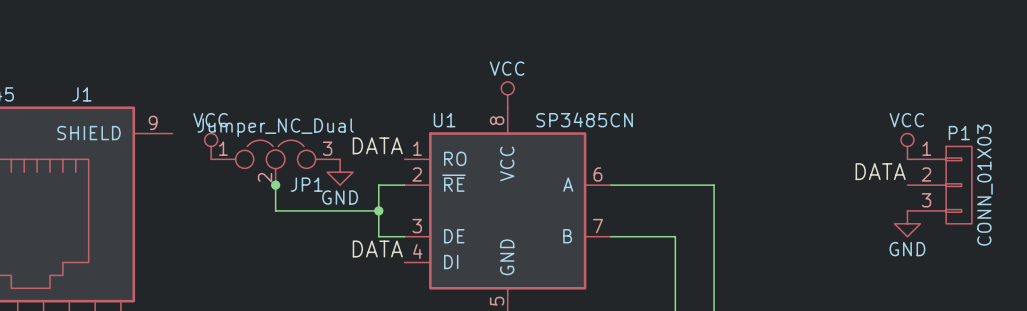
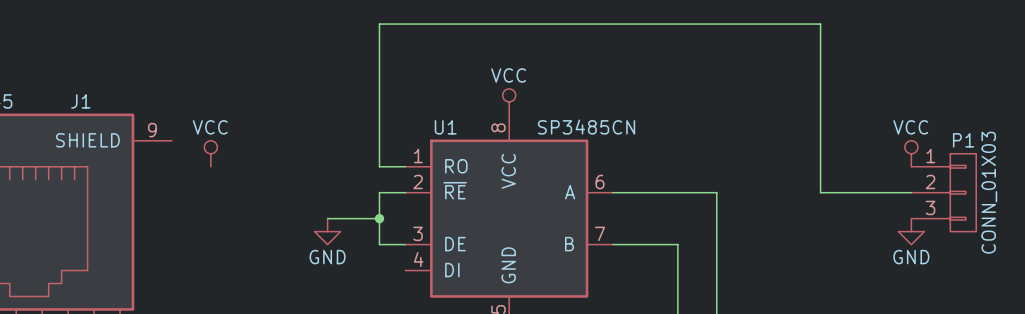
label: DATA (377, 145) -> none
wire: none -> (405, 166) (379, 166) (379, 24) (820, 24) (820, 192) (911, 192)
JP1: Jumper_NC_Dual (275, 162) -> none
label: DATA (880, 171) -> none
power symbol position: GND (340, 172) -> GND (327, 231)
wire: (275, 185) (275, 210) (327, 210) -> none
junction: (275, 185) -> none
label: DATA (377, 249) -> none

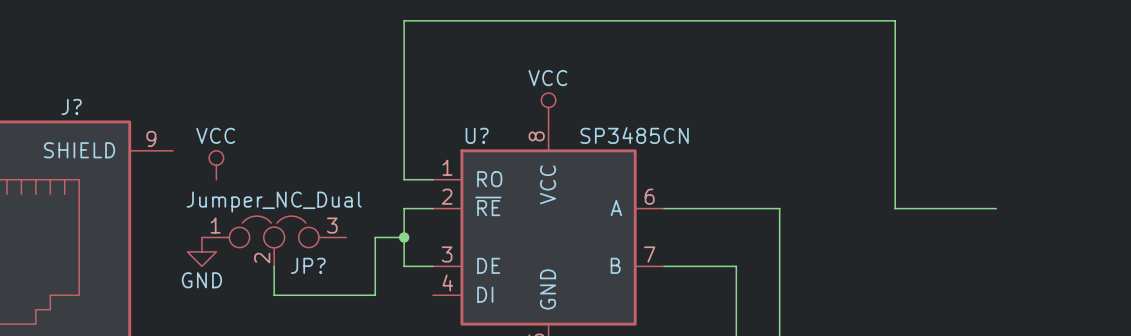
J1 name: J1 (80, 101) -> J? (71, 106)
U1 name: U1 (445, 127) -> U? (477, 135)
power symbol: VCC (911, 153) -> none
P1: CONN_01X03 (943, 192) -> none
wire: (327, 218) (353, 218) -> (274, 266) (274, 295) (375, 295) (375, 237)
JP?: none -> Jumper_NC_Dual (274, 241)
power symbol position: GND (327, 231) -> GND (201, 251)
power symbol: GND (911, 231) -> none

